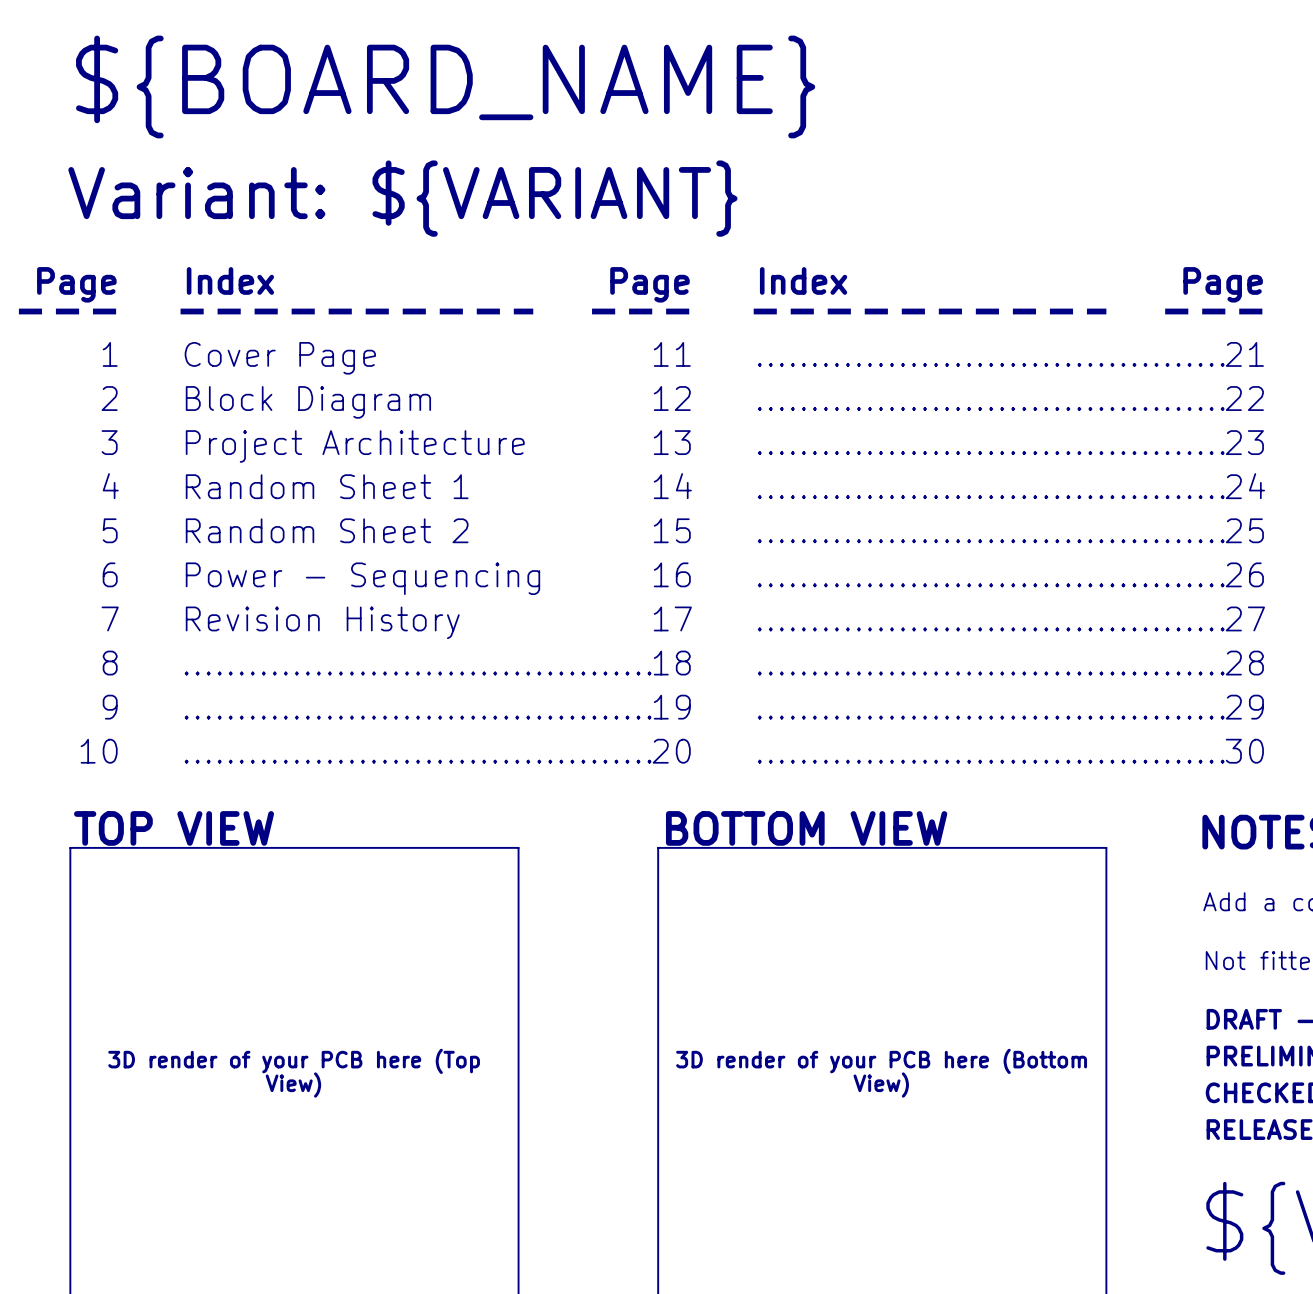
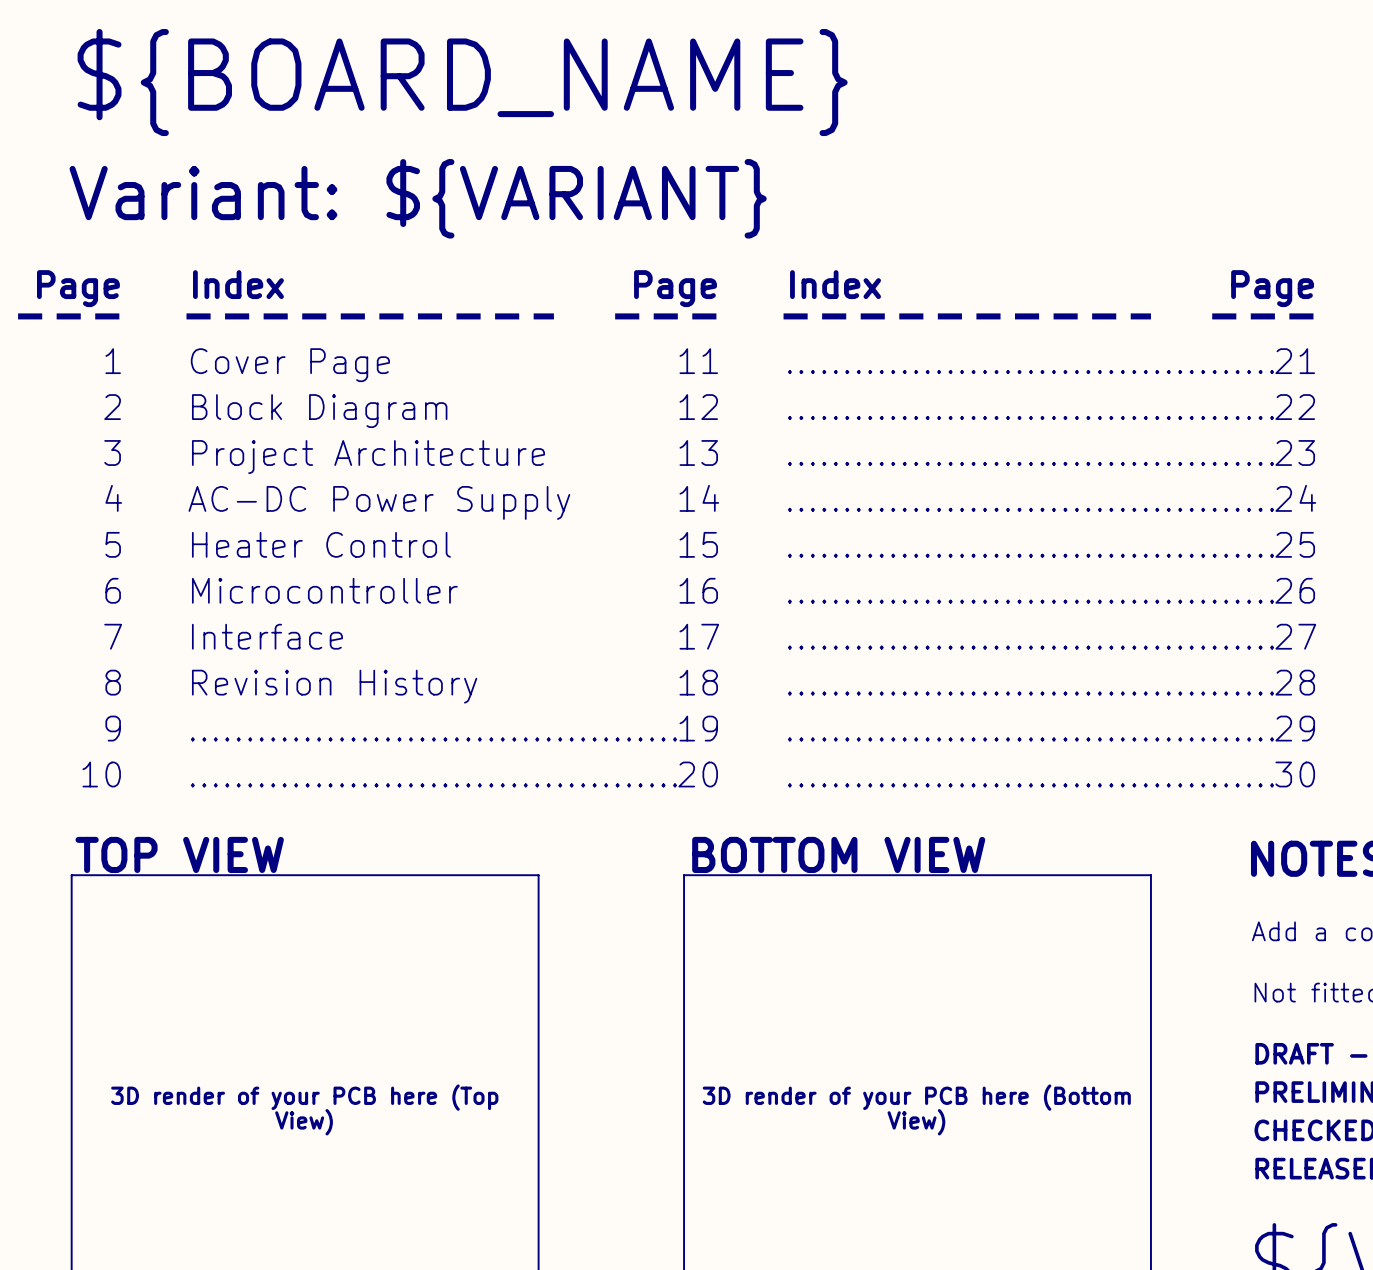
text: Random Sheet 1 (327, 486) -> AC-DC Power Supply (379, 502)
text: Random Sheet 2 (327, 530) -> Heater Control (321, 544)
text: Power - Sequencing (362, 578) -> Microcontroller (324, 590)
text: Revision History (322, 622) -> Interface (267, 636)
text: ........................................... (418, 673) -> Revision History (334, 686)

